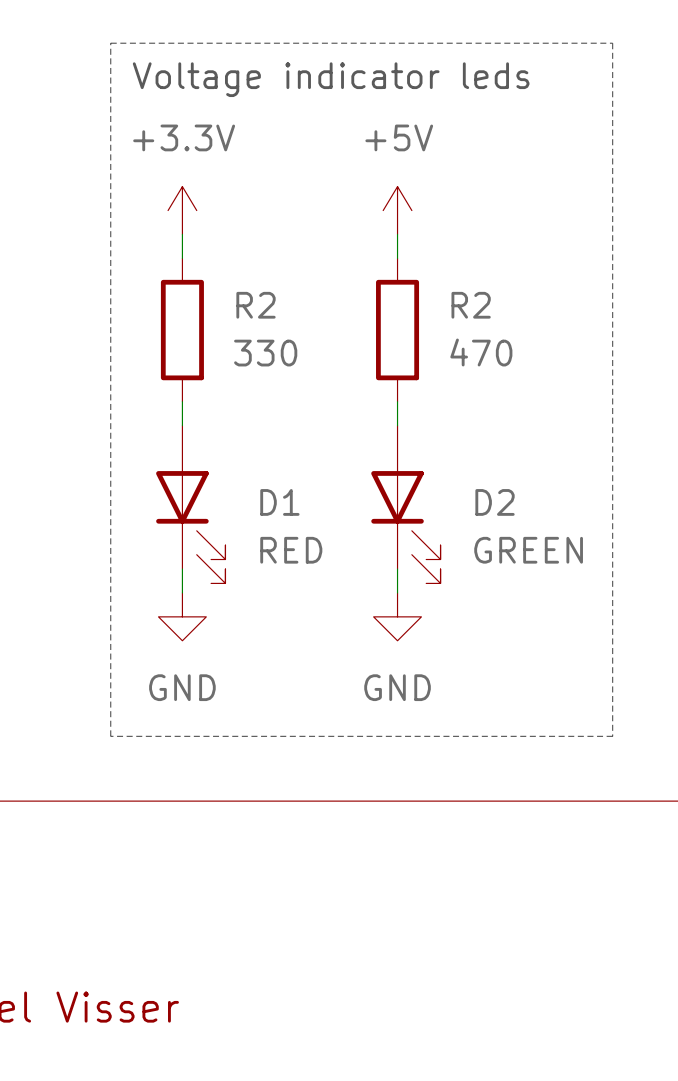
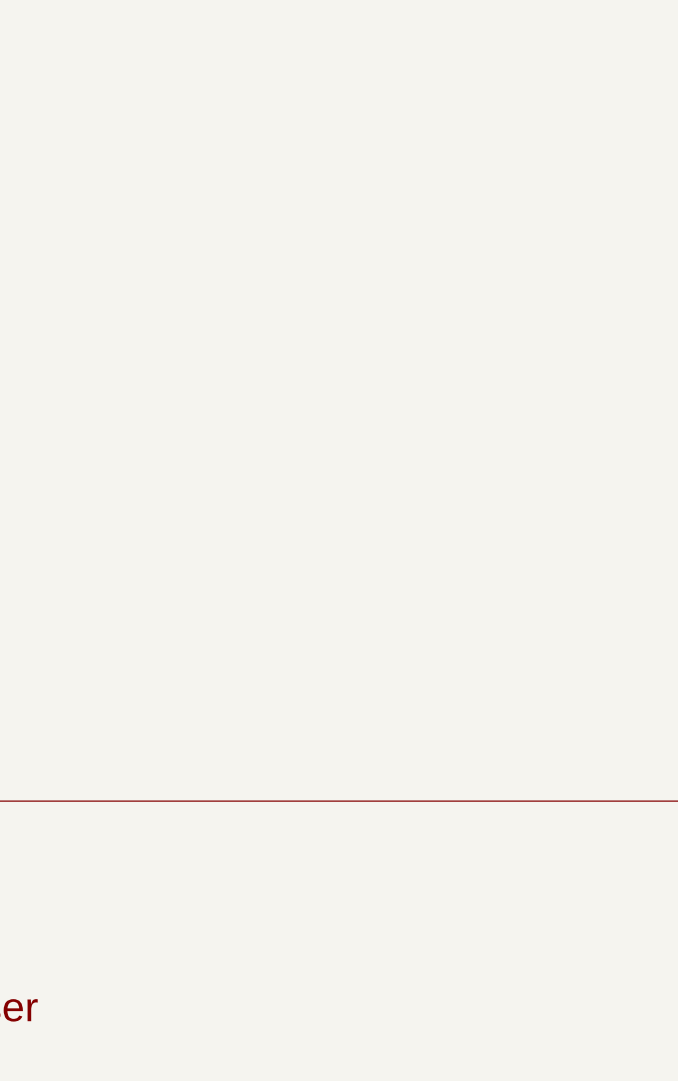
line: (110, 43) (612, 43) (612, 736) (110, 736) (110, 43) -> none
text: Voltage indicator leds (331, 79) -> none
power symbol: +3.3V (182, 210) -> none
power symbol: +5V (397, 210) -> none
wire: (182, 234) (182, 258) -> none
wire: (397, 234) (397, 258) -> none
R2: 330 (182, 330) -> none
R2: 470 (397, 330) -> none
wire: (182, 401) (182, 425) -> none
wire: (397, 401) (397, 425) -> none
D1: RED (190, 504) -> none
D2: GREEN (405, 504) -> none
wire: (182, 569) (182, 592) -> none
wire: (397, 569) (397, 592) -> none
power symbol: GND (182, 616) -> none
power symbol: GND (397, 616) -> none

